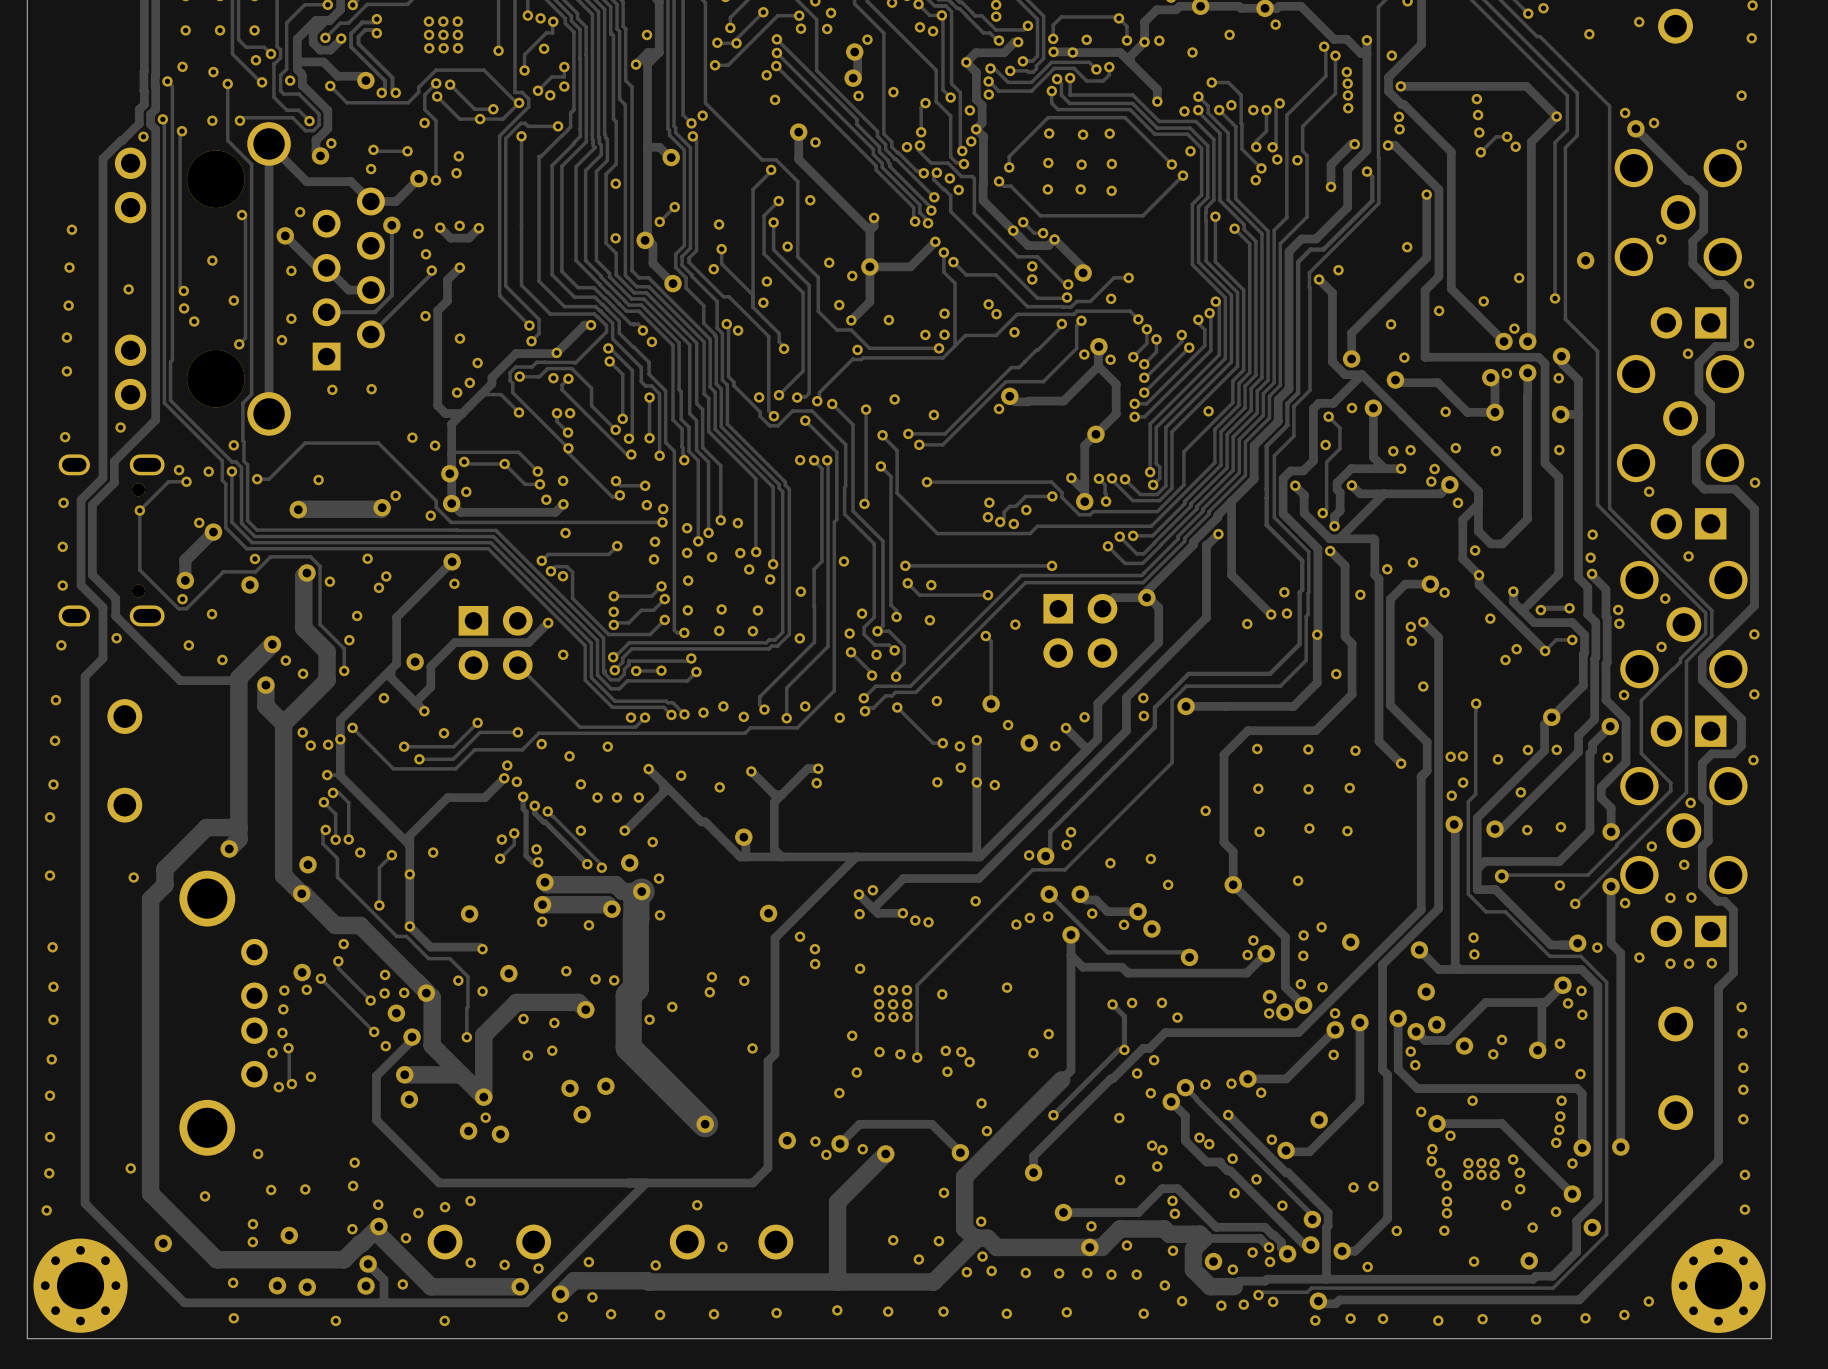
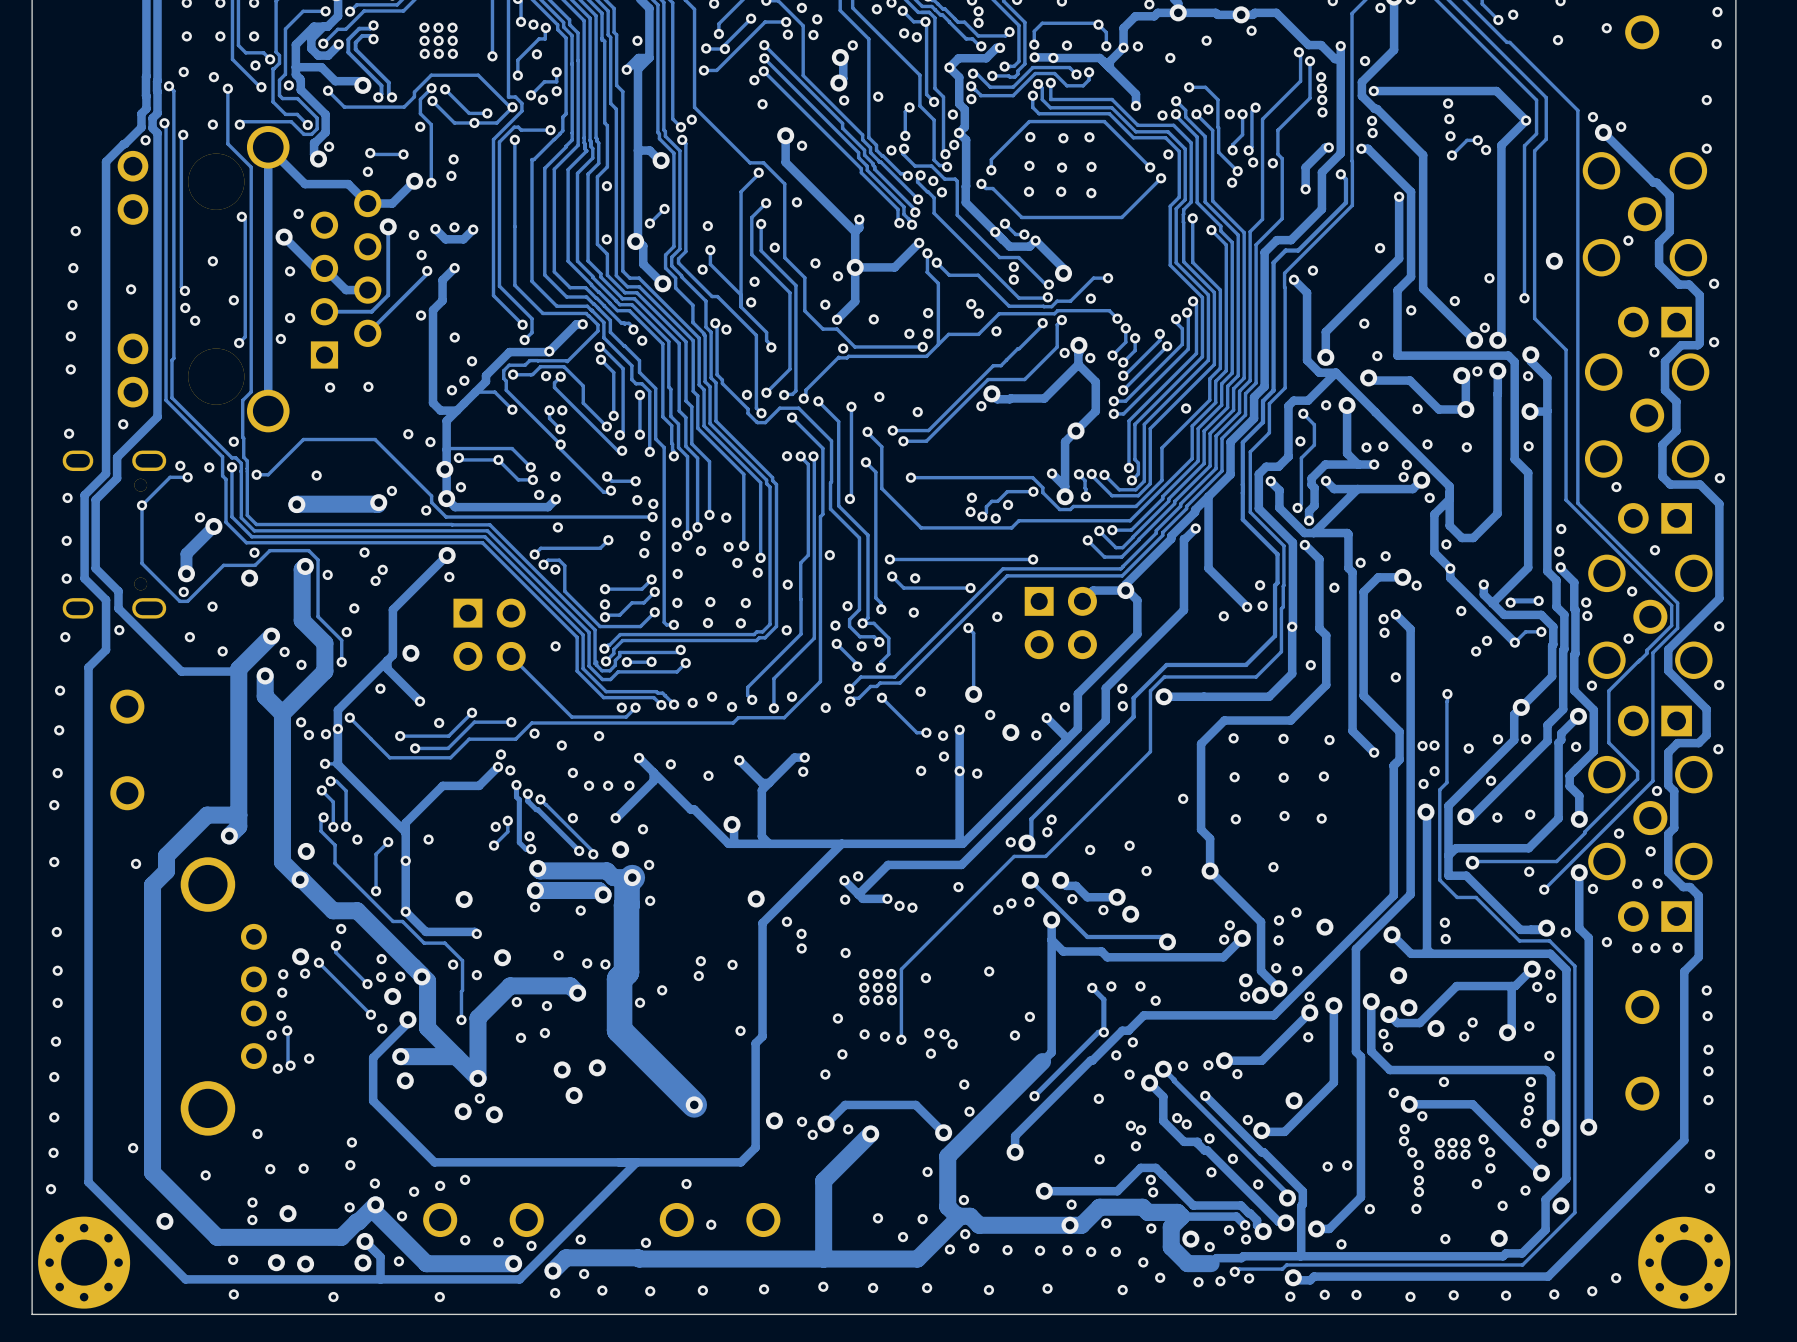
track: (548, 622) (528, 642) (454, 642) (430, 666) (430, 687) (415, 702) -> none
via: (548, 622) -> none

